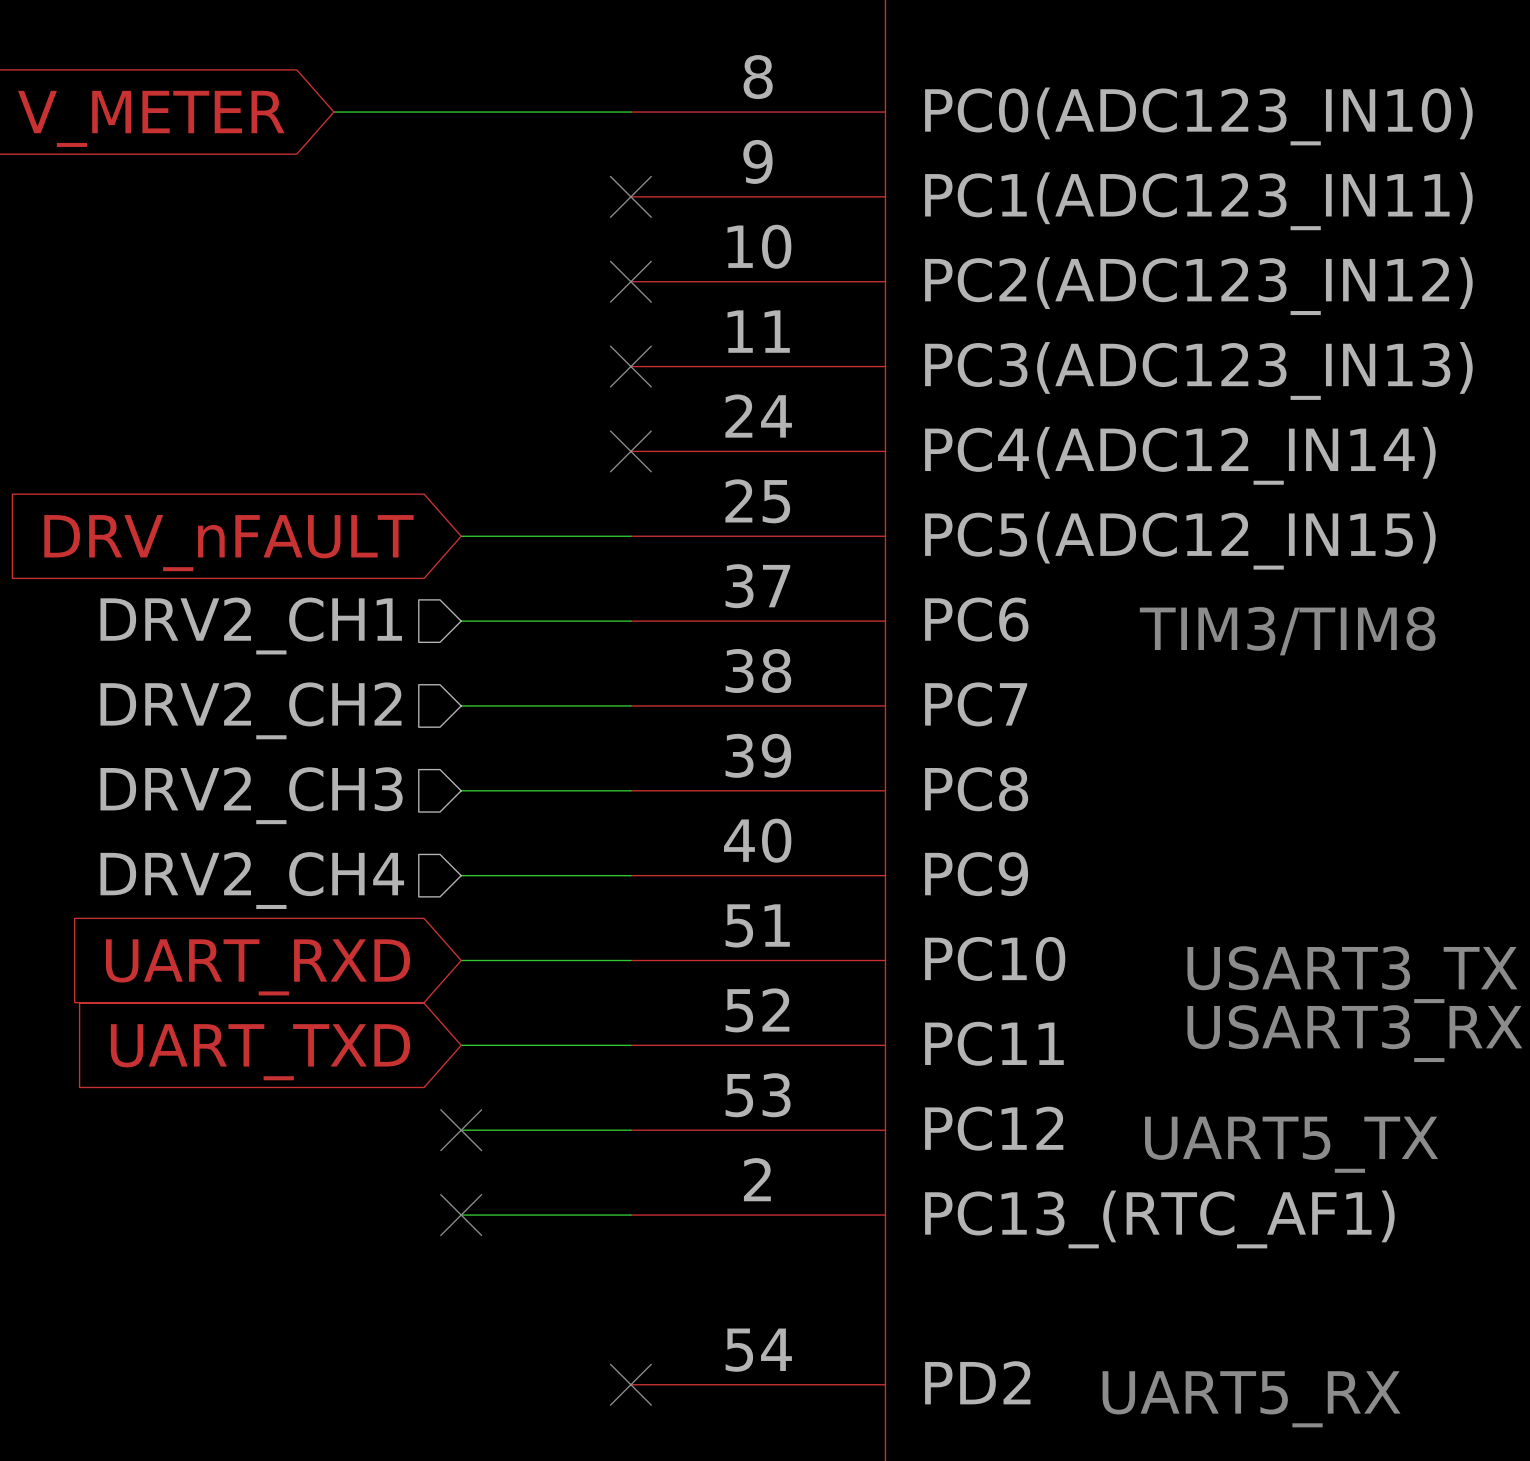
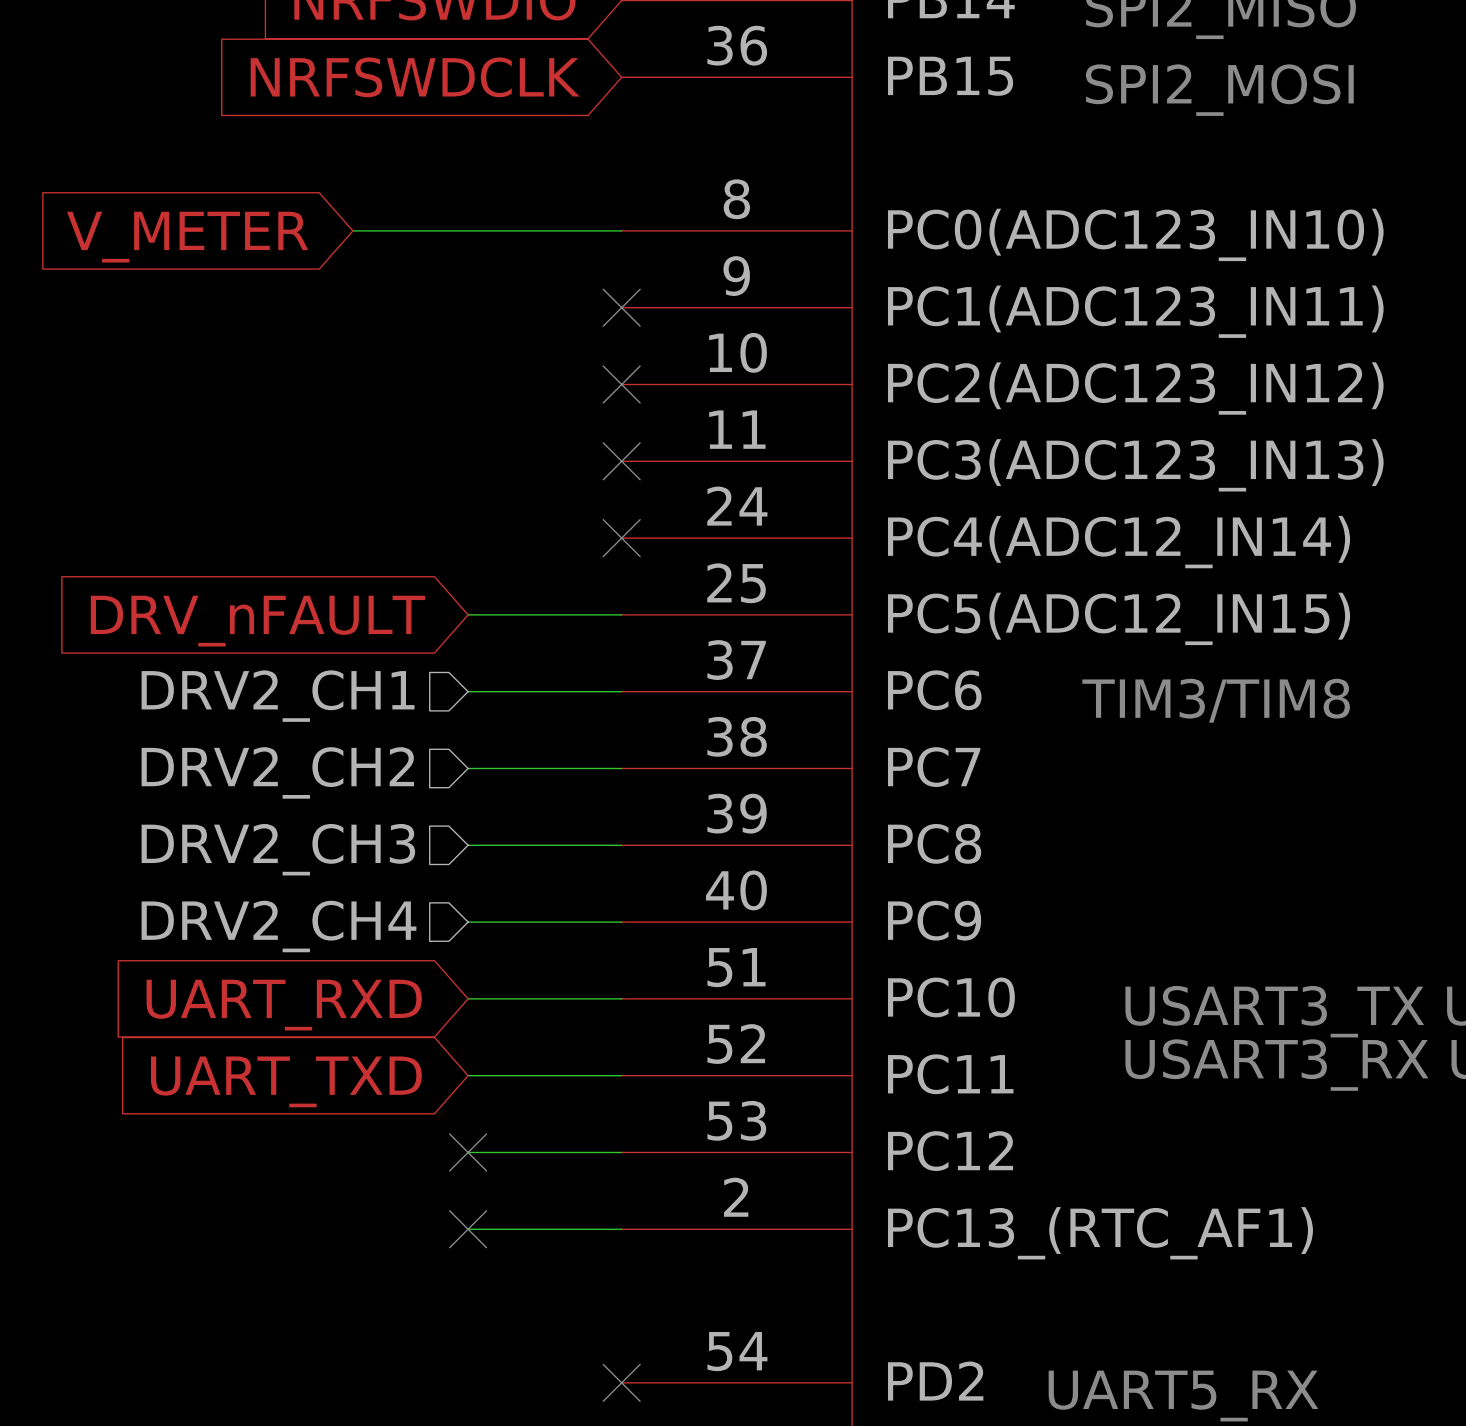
text: UART5_TX (1291, 1144) -> none

